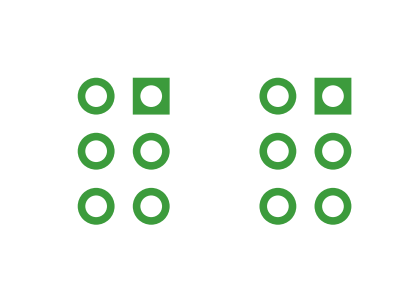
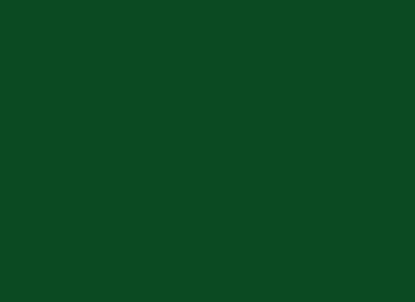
part: (123, 151) -> none
part: (305, 151) -> none

